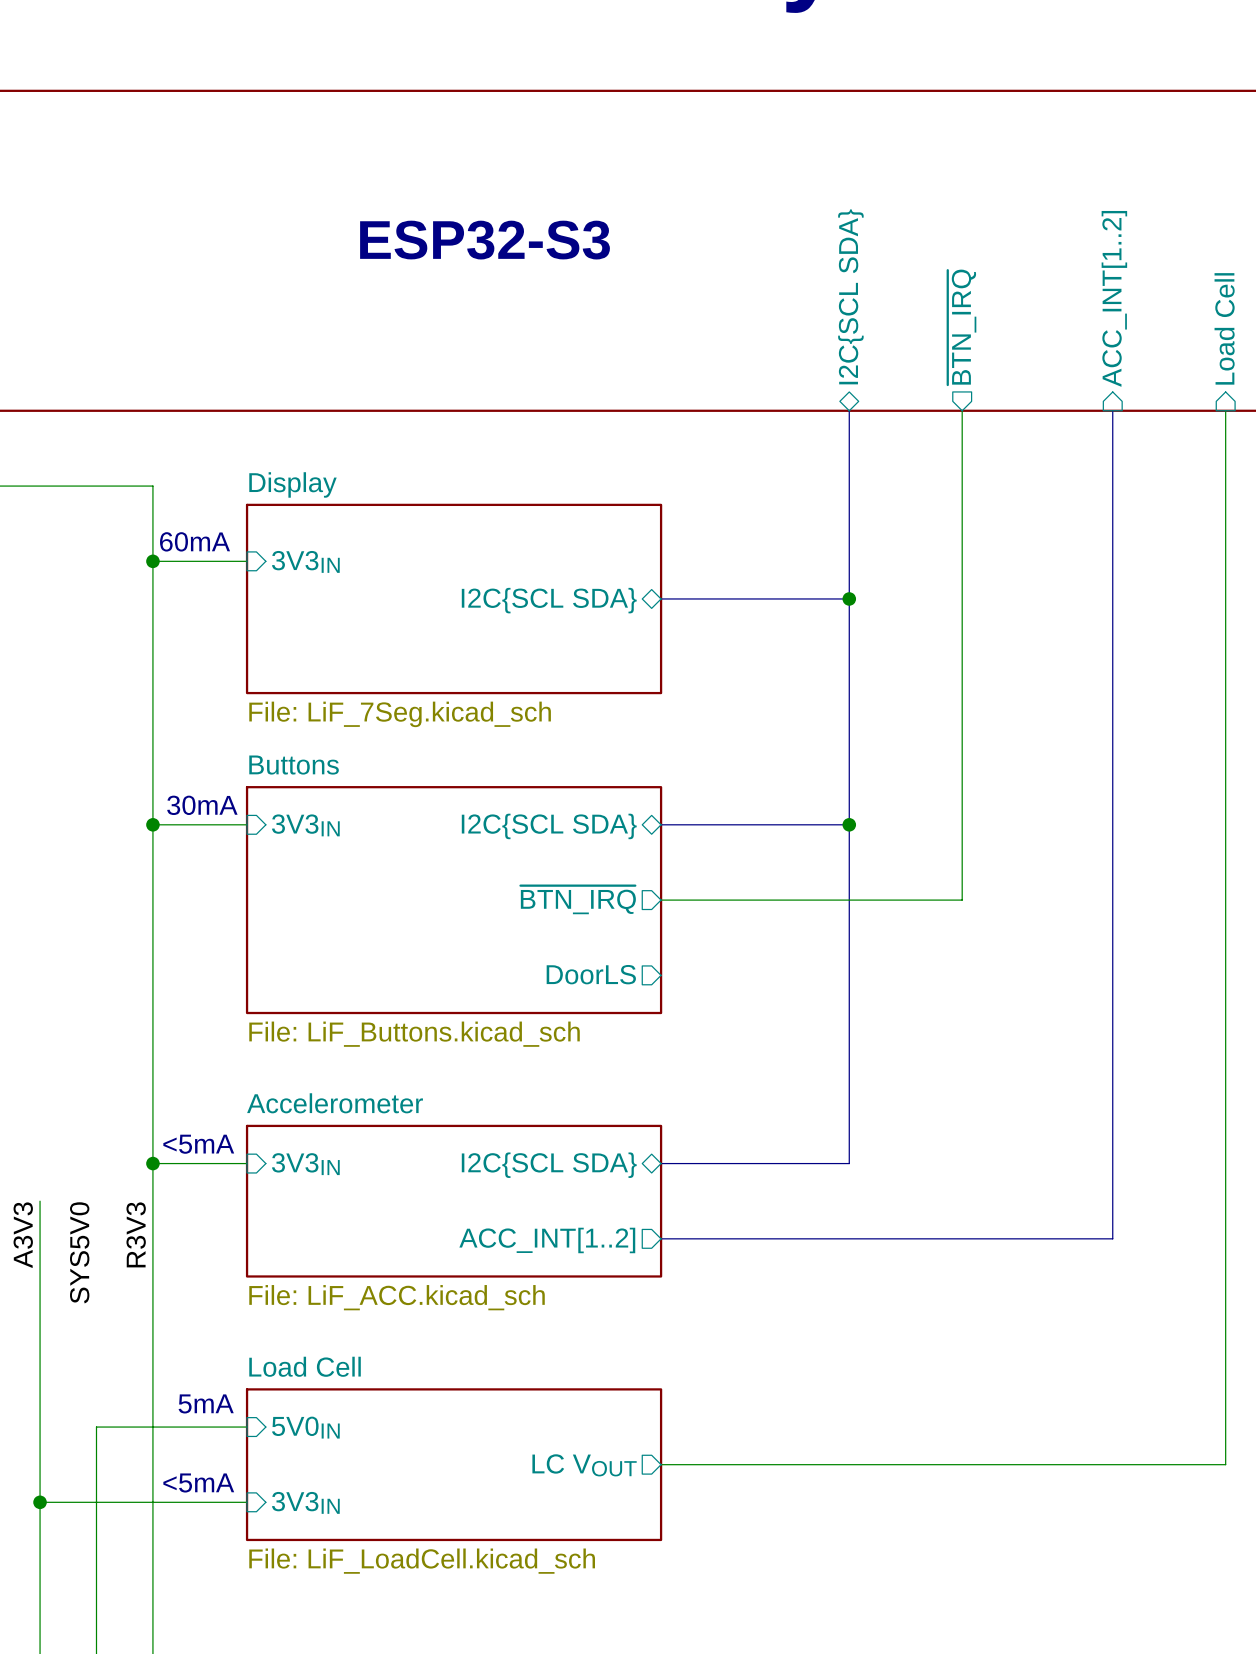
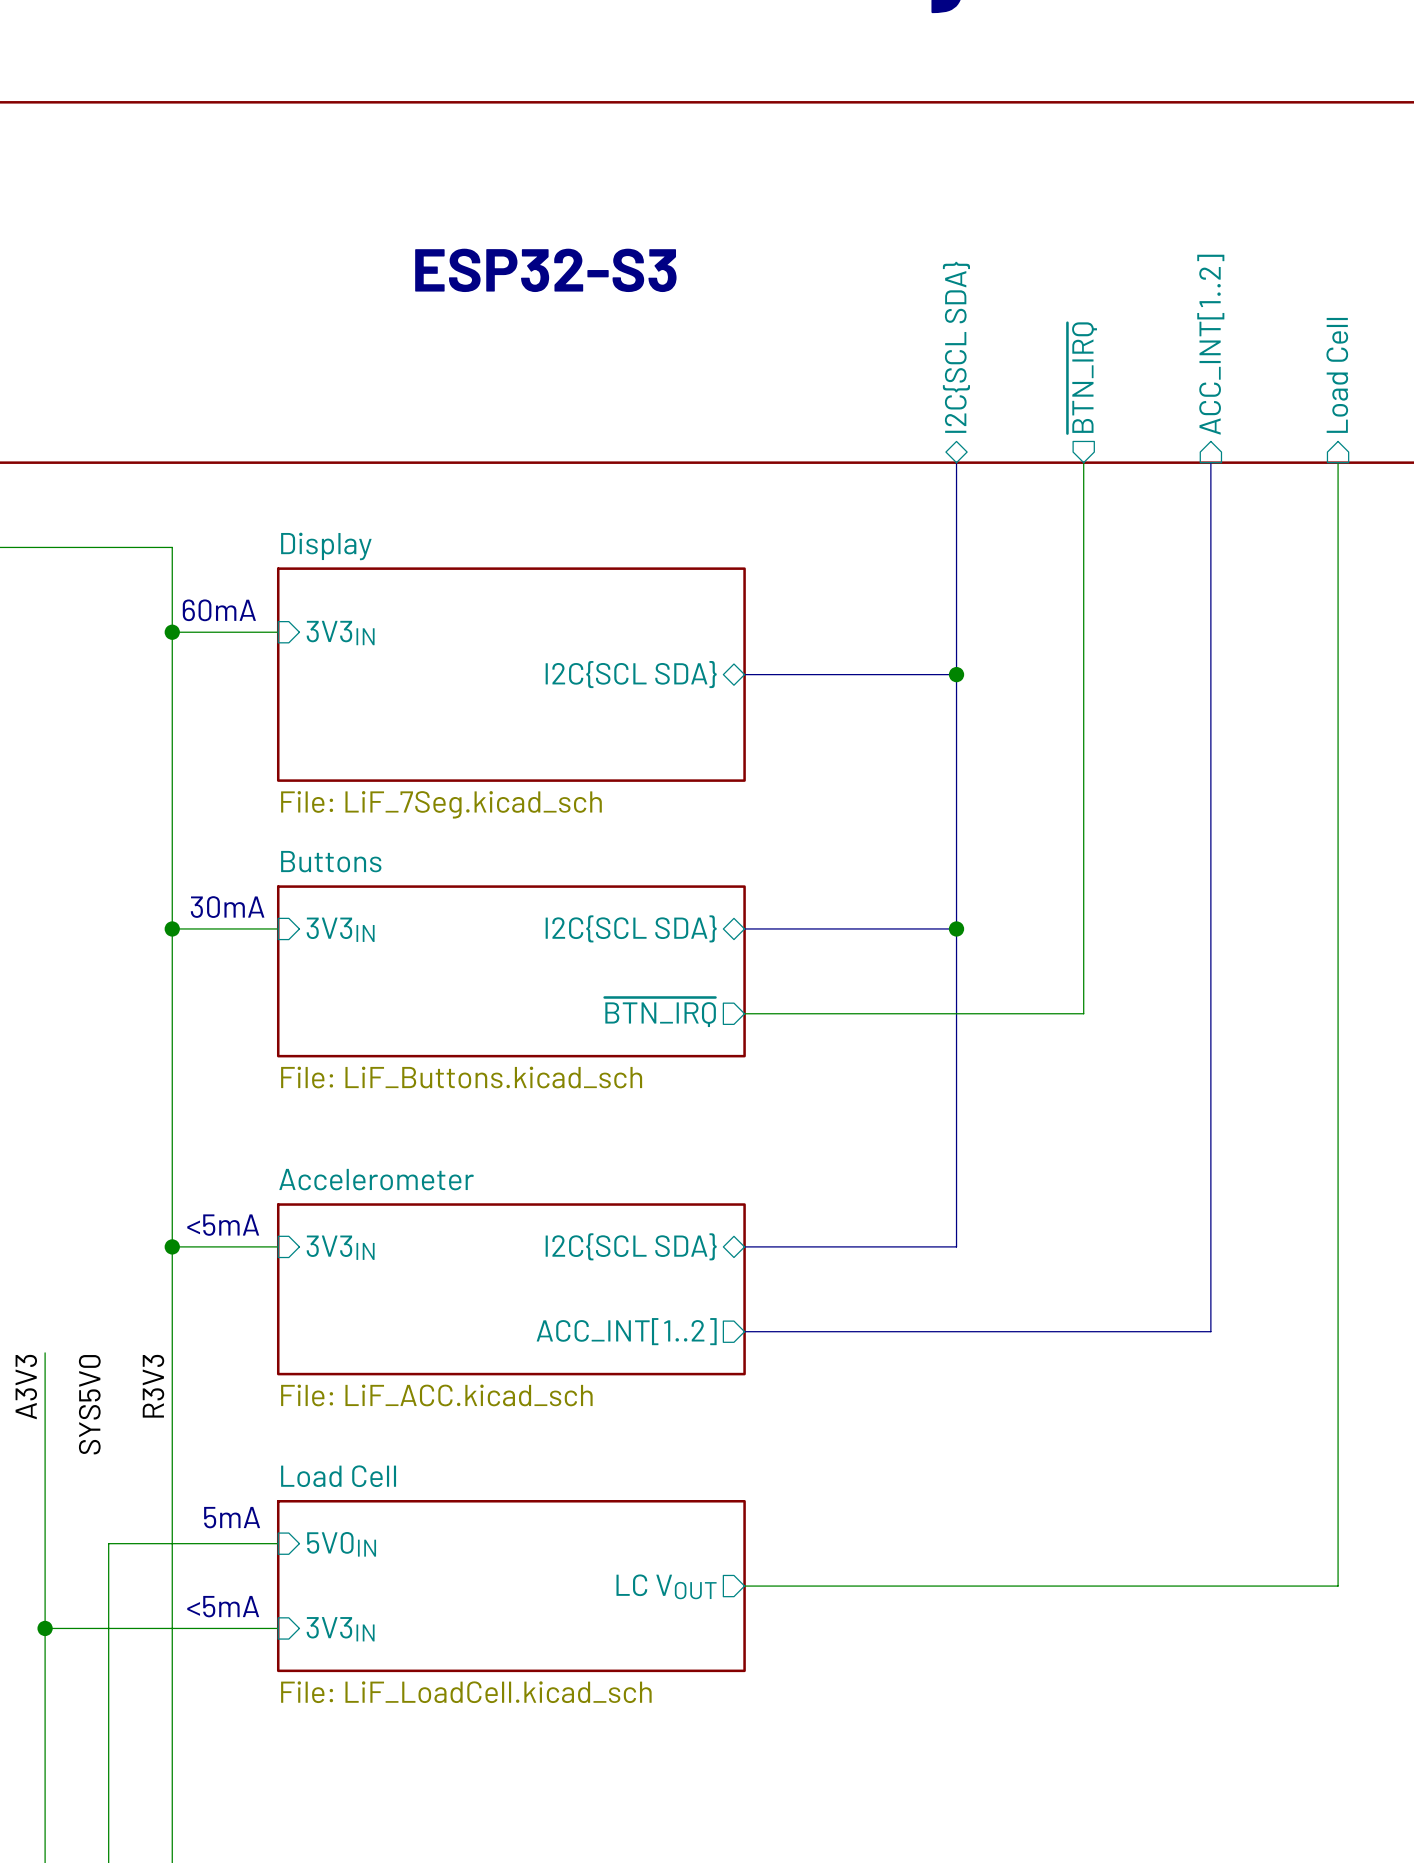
sheet pin position: ACC_INT[1..2] (1114, 298) -> ACC_INT[1..2] (1210, 344)
sheet pin position: Load Cell (1224, 328) -> Load Cell (1337, 375)
bus: none -> (1210, 462) (1210, 1331) (744, 1331)
bus: (1112, 410) (1112, 1238) (661, 1238) -> none
wire: none -> (1338, 462) (1338, 1586) (744, 1586)
wire: (1225, 410) (1225, 1464) (661, 1464) -> none
sheet Buttons: none -> File: LiF_Buttons.kicad_sch (511, 971)
sheet Buttons: File: LiF_Buttons.kicad_sch (454, 900) -> none
sheet pin: DoorLS (591, 974) -> none
bus: (849, 1107) (849, 1163) (661, 1163) -> (956, 1246) (744, 1246)
text position: <5mA (198, 1144) -> <5mA (223, 1225)
wire: (152, 1163) (247, 1163) -> (172, 1246) (278, 1246)
junction position: (152, 1163) -> (172, 1246)
sheet pin position: 3V3IN (305, 1164) -> 3V3IN (340, 1247)
sheet pin position: I2C{SCL SDA} (549, 1165) -> I2C{SCL SDA} (631, 1246)
sheet Accelerometer position: (454, 1201) -> (511, 1289)
sheet pin position: ACC_INT[1..2] (547, 1240) -> ACC_INT[1..2] (626, 1331)
text position: 5mA (206, 1403) -> 5mA (232, 1517)
wire: (96, 1427) (247, 1427) -> (108, 1607) (108, 1543) (278, 1543)
sheet pin position: 5V0IN (305, 1427) -> 5V0IN (341, 1544)
sheet Load Cell position: (454, 1464) -> (511, 1586)
sheet pin position: LC VOUT (584, 1465) -> LC VOUT (666, 1586)
text position: <5mA (198, 1482) -> <5mA (223, 1606)
wire: (40, 1502) (247, 1502) -> (45, 1628) (278, 1628)
junction position: (40, 1502) -> (45, 1628)
sheet pin position: 3V3IN (305, 1502) -> 3V3IN (340, 1629)

